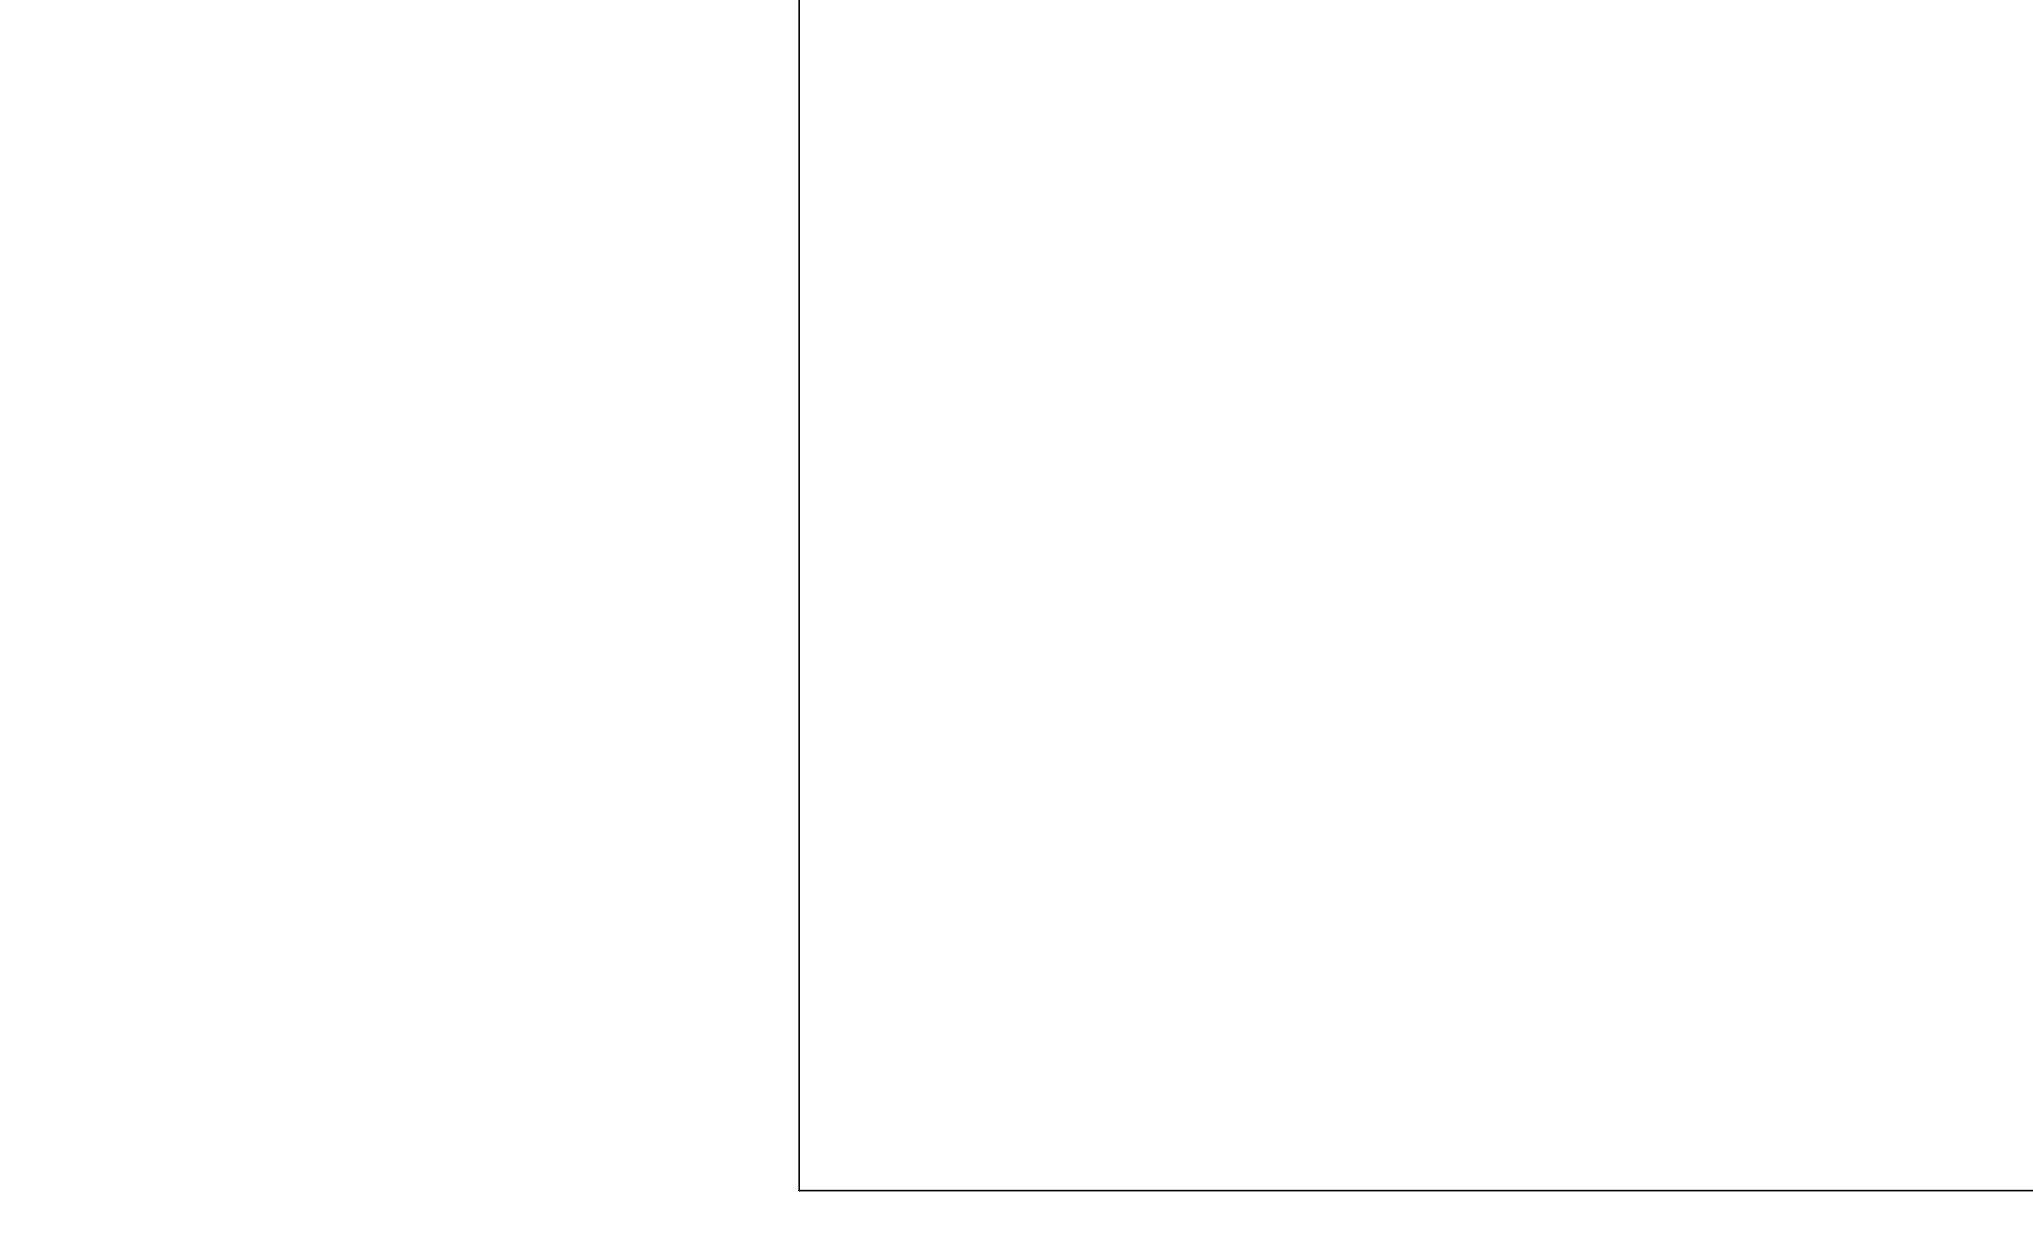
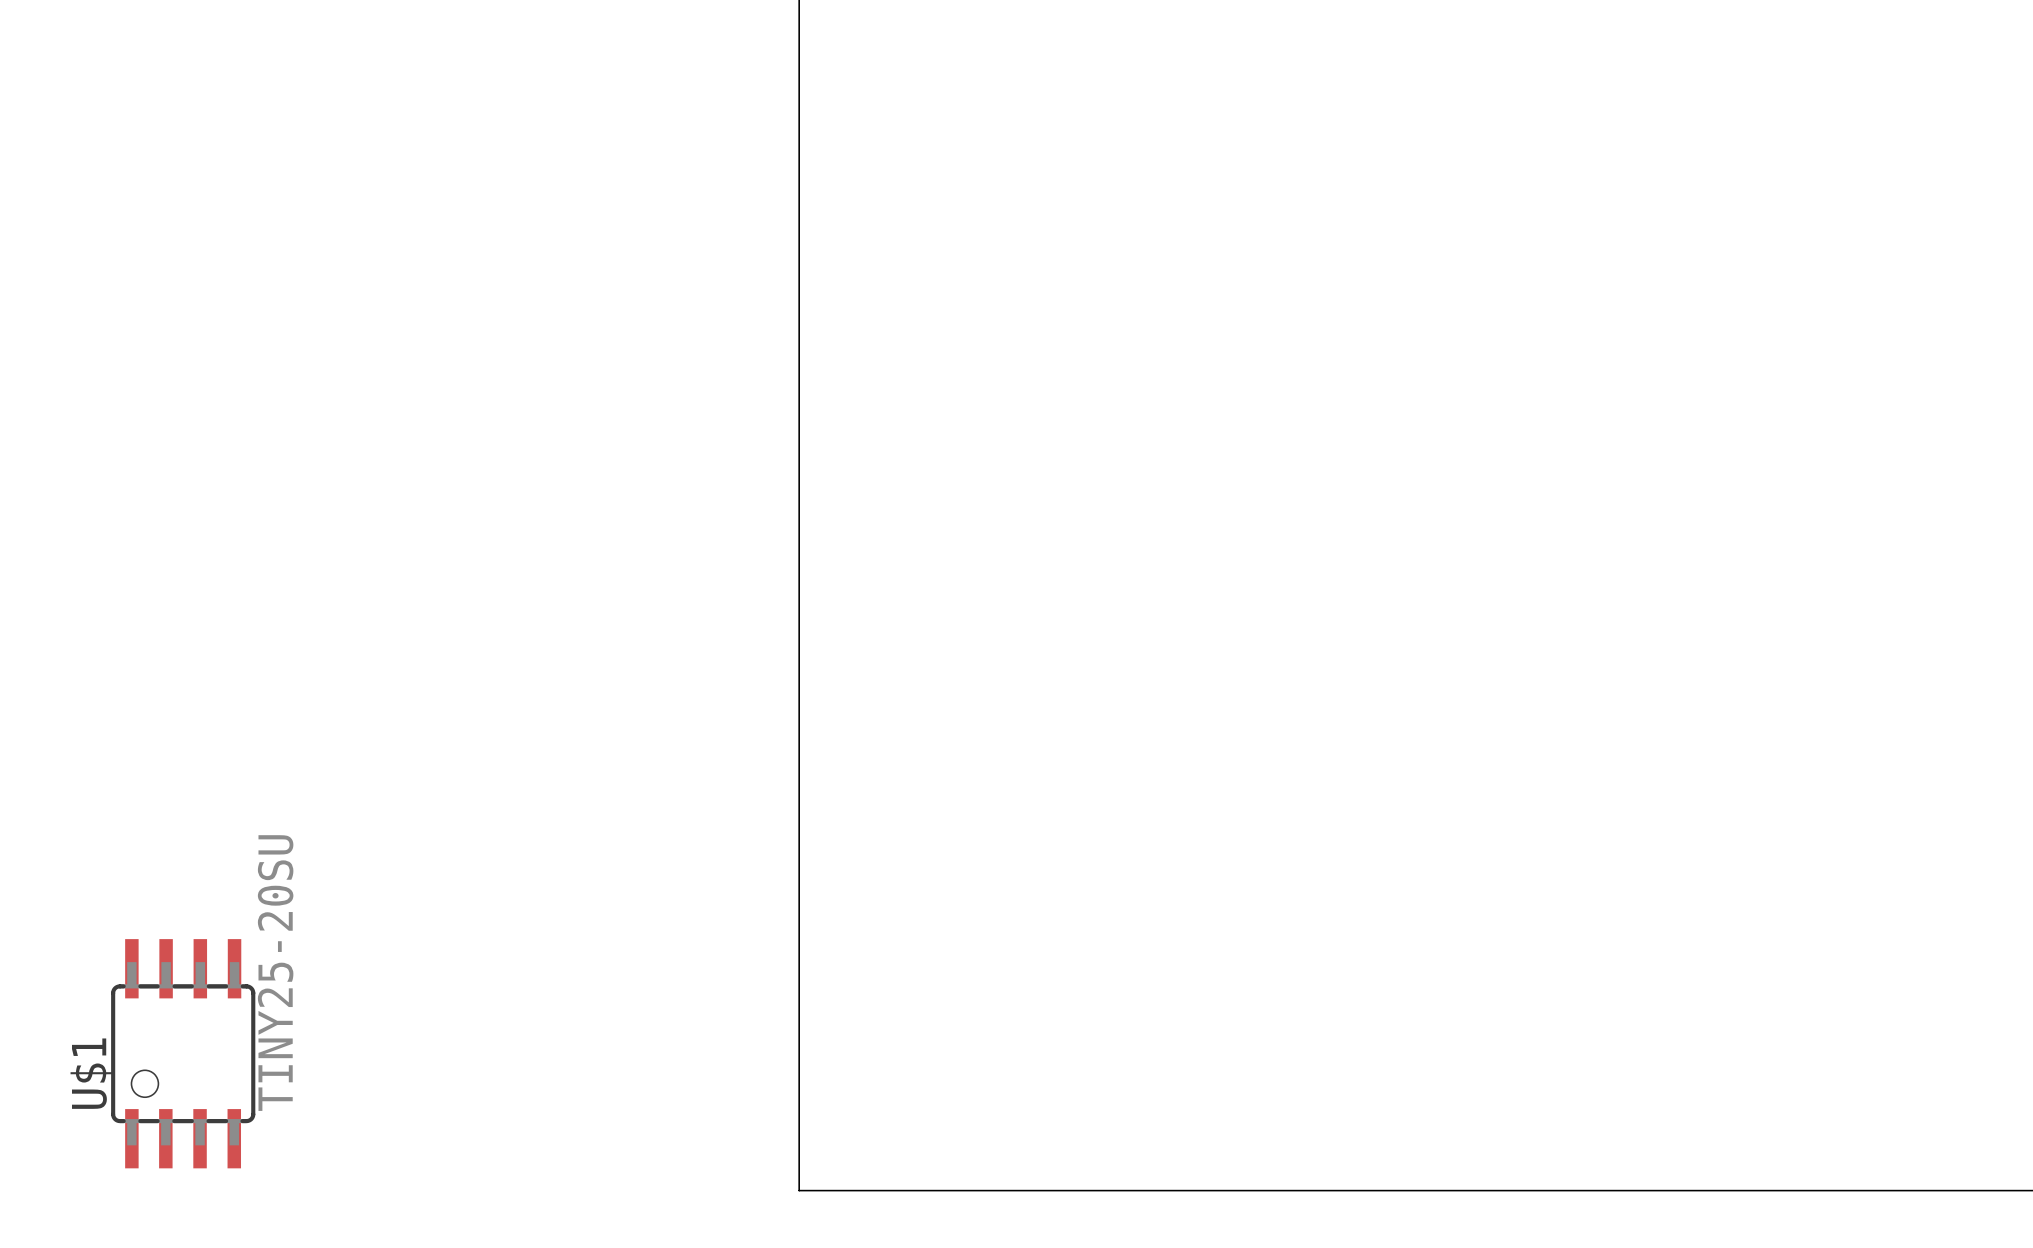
U$1: none -> TINY25-20SU (183, 1053)

